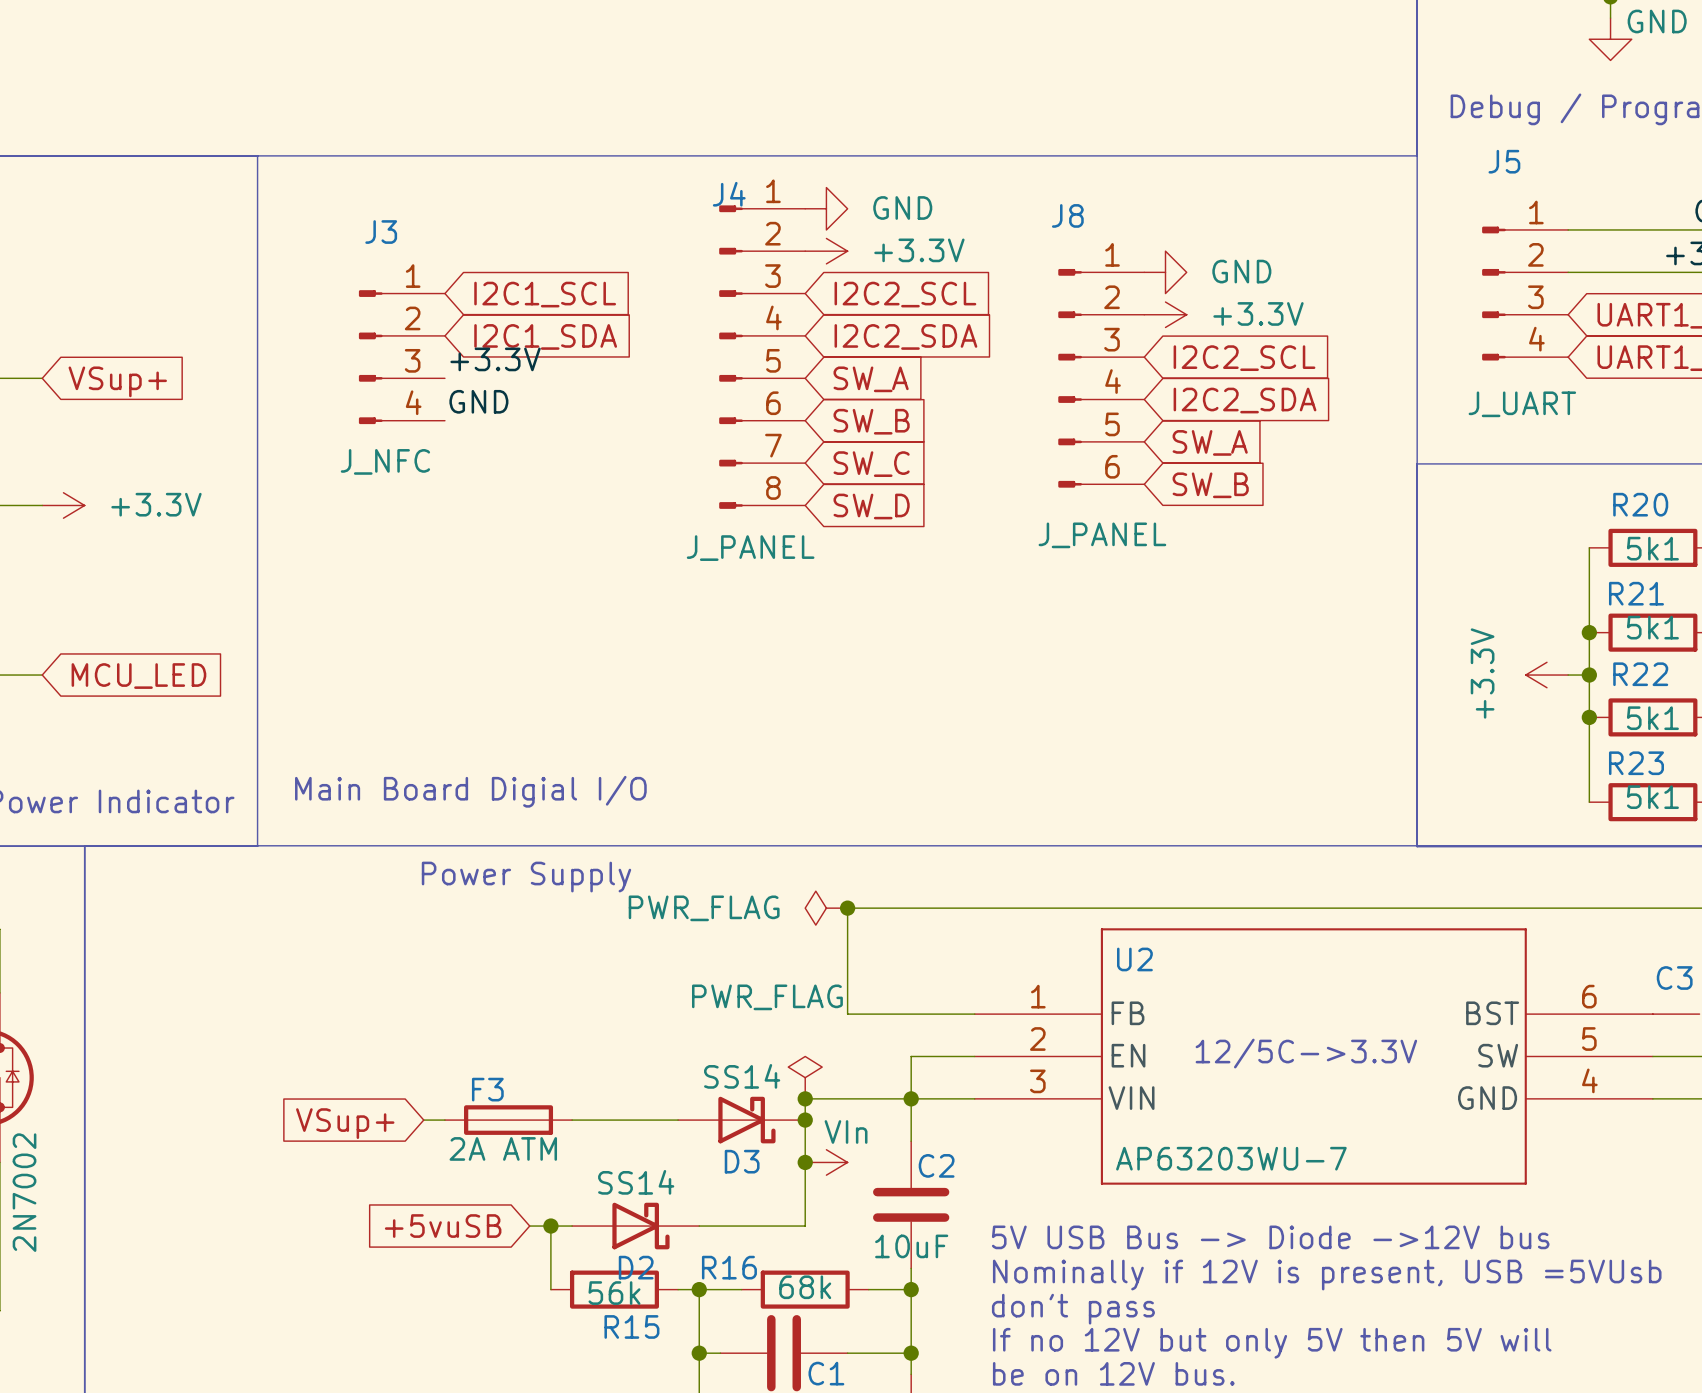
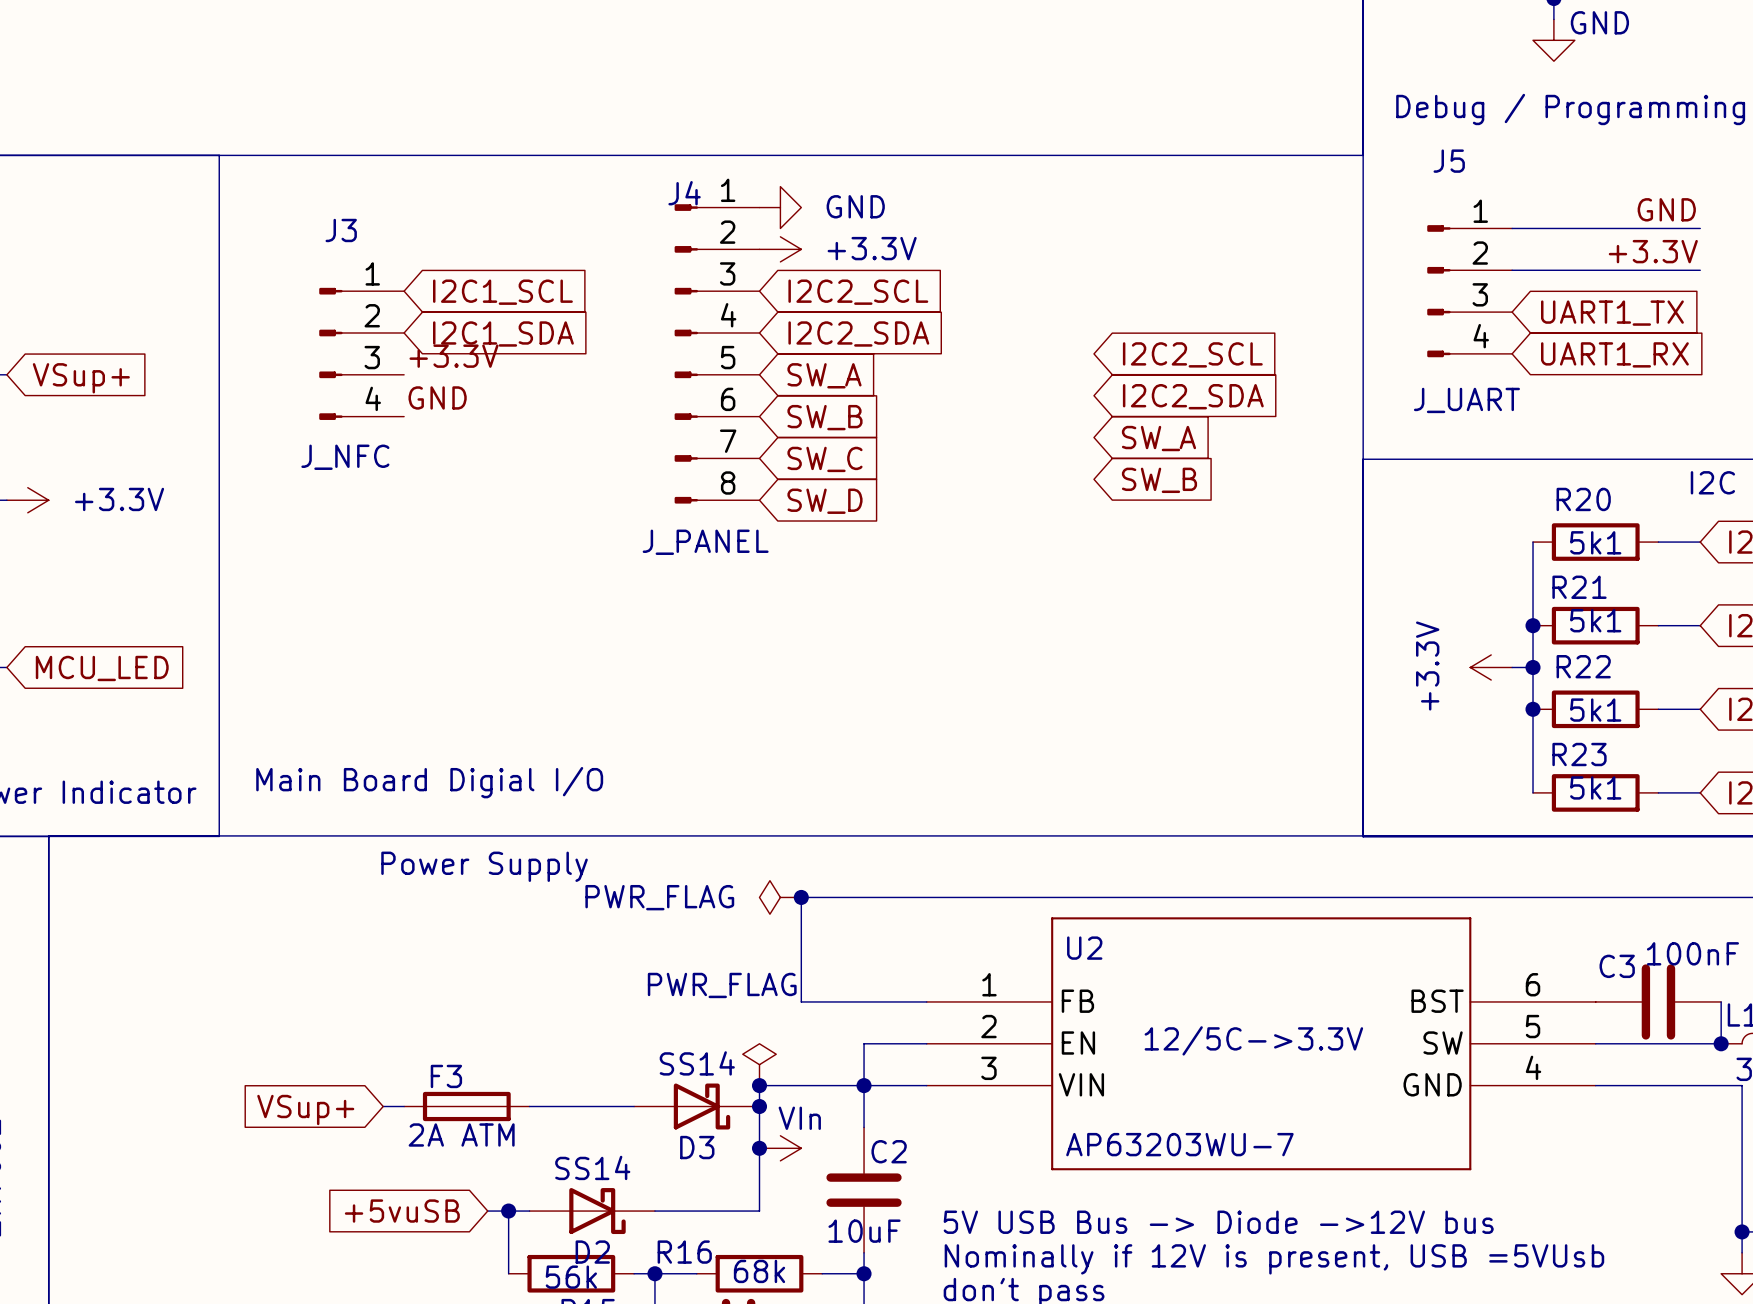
power symbol: GND (1165, 272) -> none
power symbol: +3.3V (1165, 314) -> none
J8: J_PANEL (1101, 378) -> none

